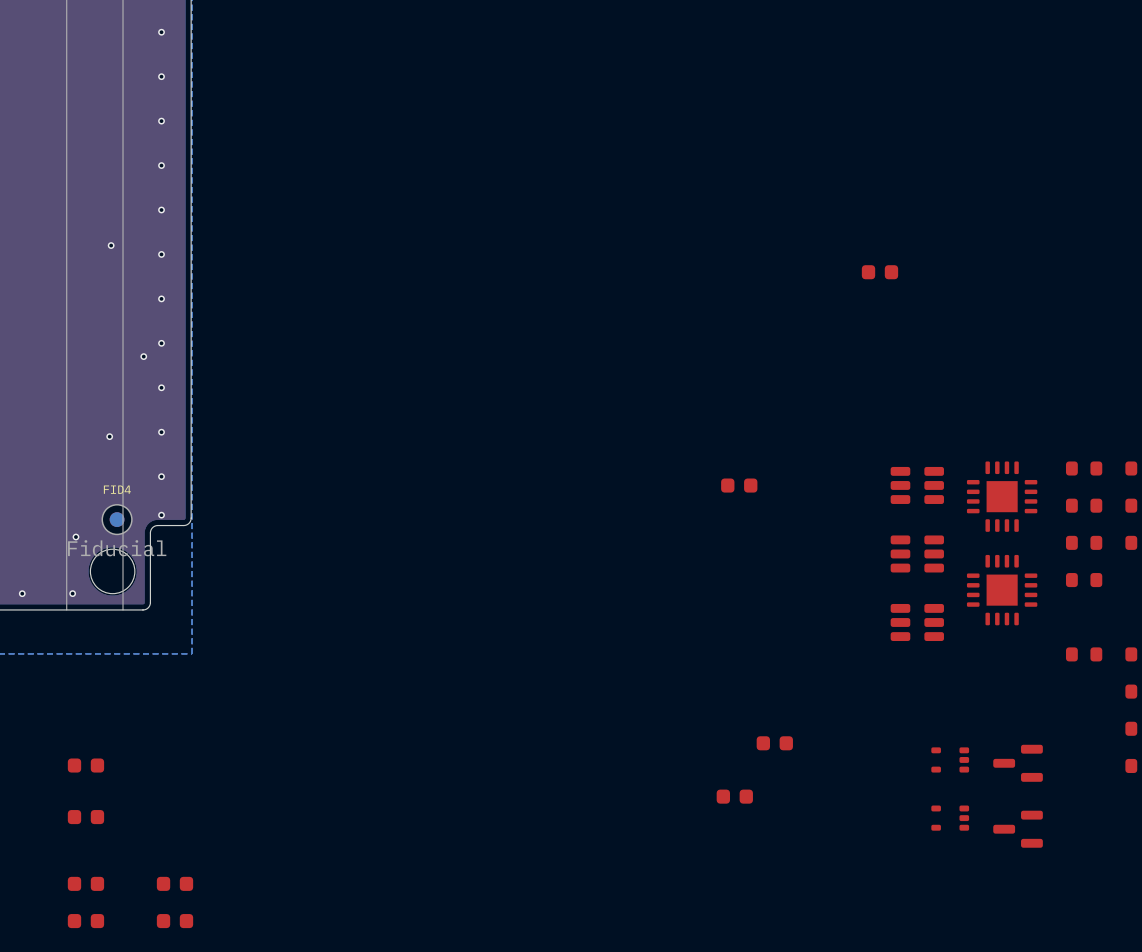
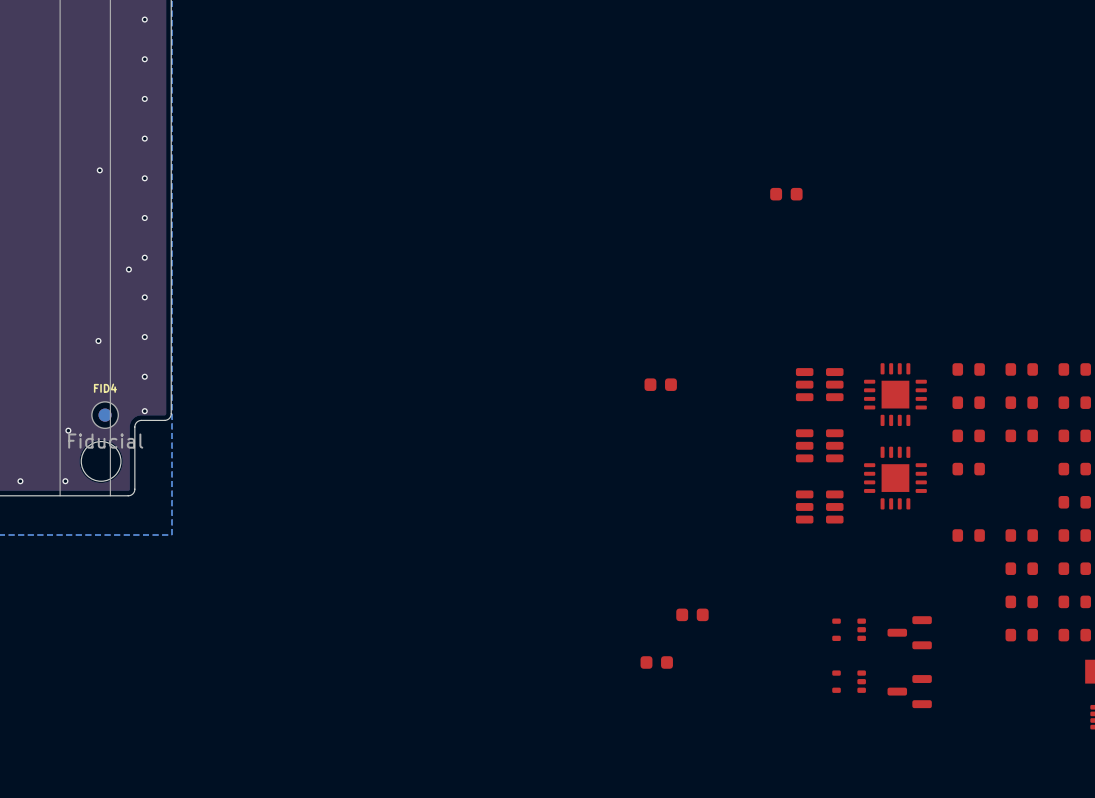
part: (85, 765) -> none
part: (85, 817) -> none
part: (85, 883) -> none
part: (175, 883) -> none
part: (85, 921) -> none
part: (175, 921) -> none

